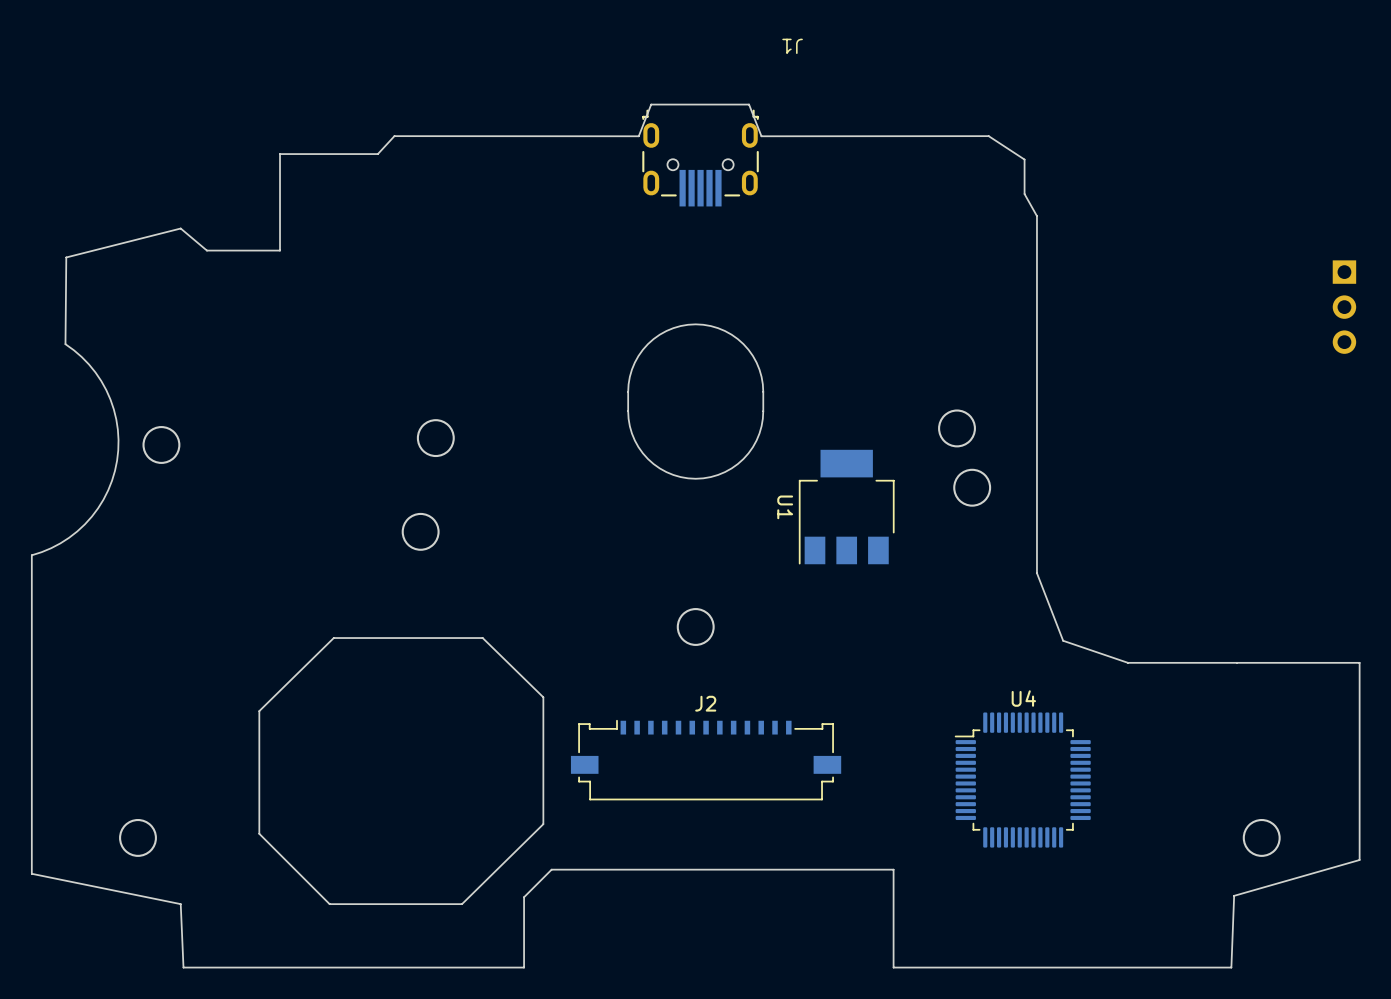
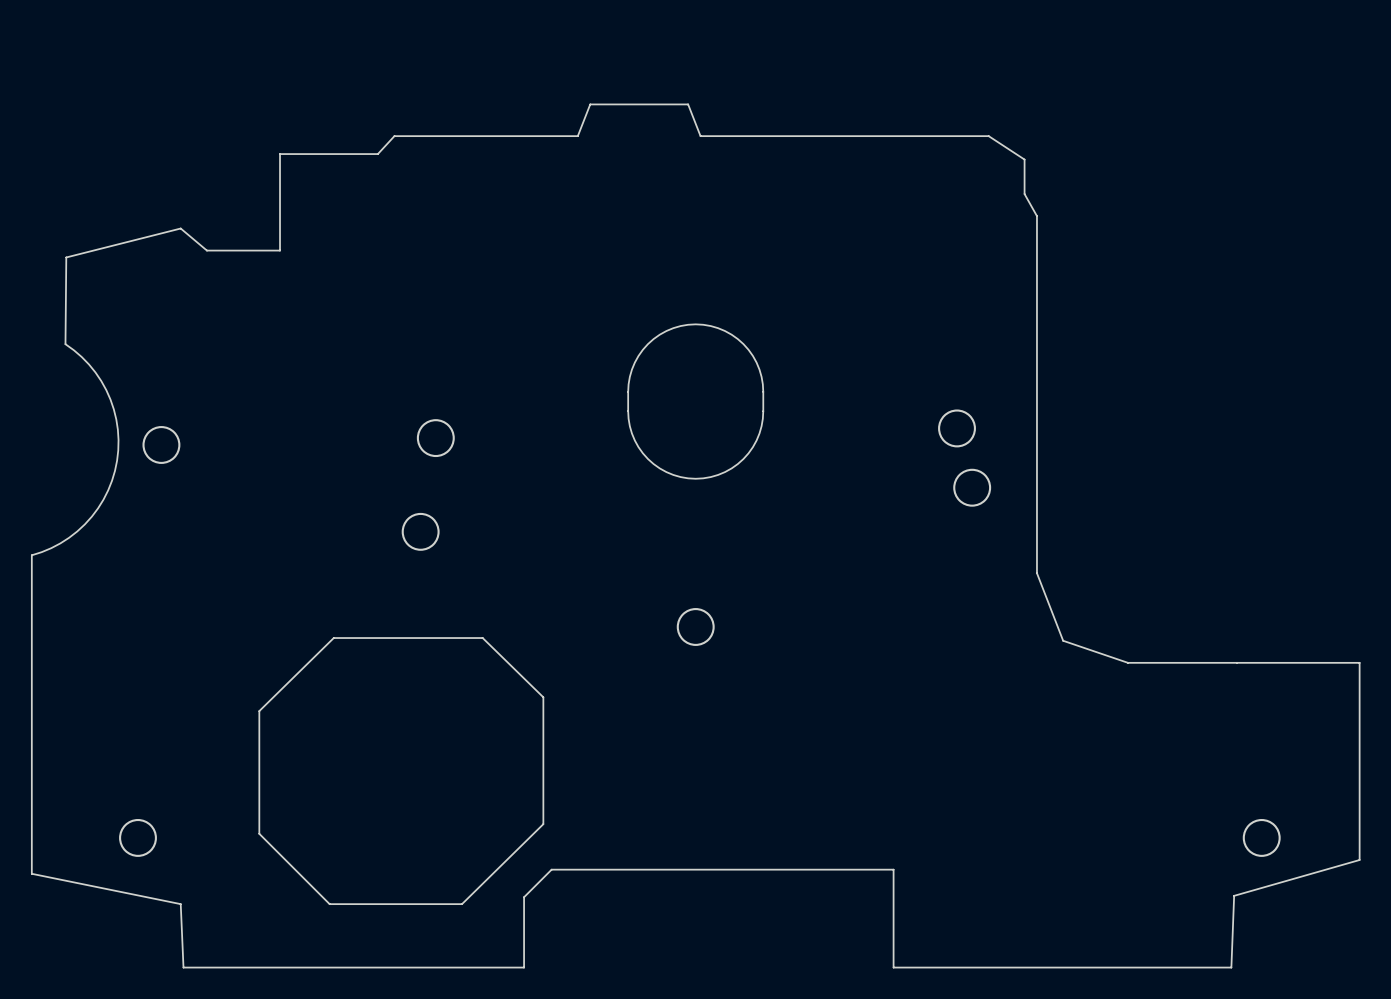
board edge: (988, 136) (761, 136) (749, 104) (651, 104) (638, 136) (394, 136) -> (988, 136) (700, 136) (688, 104) (590, 104) (577, 136) (394, 136)
J1: (700, 158) -> none
part: (1344, 307) -> none
U1: (846, 507) -> none
J2: (706, 760) -> none
U4: (1022, 780) -> none

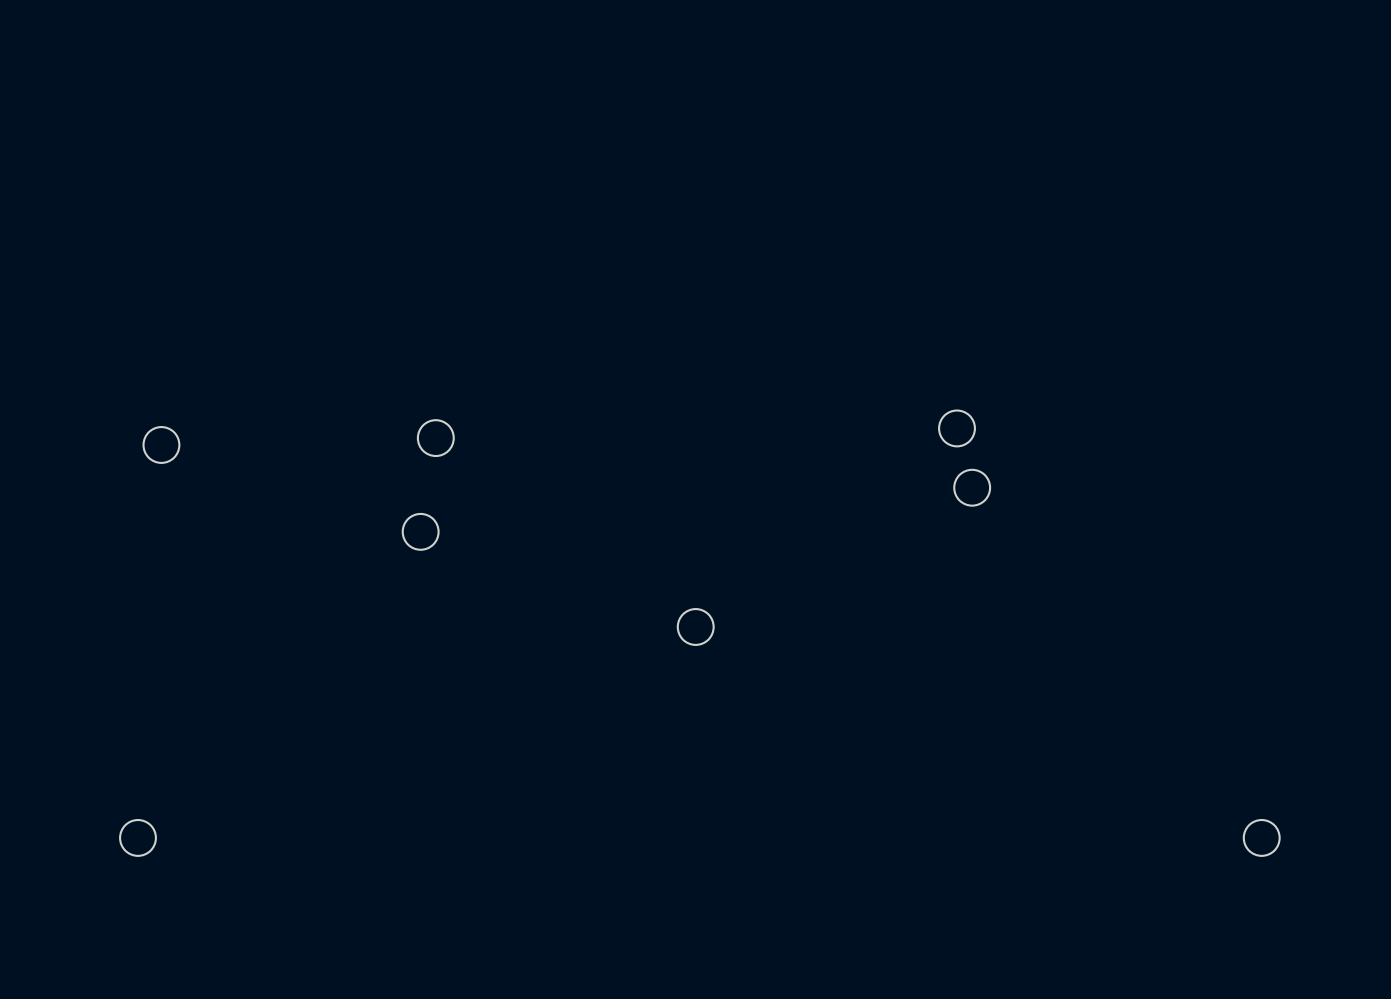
board edge: (688, 104) (700, 136) (988, 136) (1024, 159) (1024, 194) (1036, 216) (1036, 573) (1063, 640) (1127, 662) (1359, 662) (1359, 860) (1234, 895) (1231, 967) (893, 967) (893, 869) (551, 869) (524, 897) (524, 967) (183, 967) (180, 904) (31, 873) (31, 555) (51, 548) (69, 537) (91, 516) (108, 490) (115, 470) (118, 450) (116, 419) (106, 390) (88, 364) (65, 344) (66, 257) (180, 228) (206, 250) (280, 250) (280, 154) (377, 154) (394, 136) (577, 136) (590, 104) (688, 104) -> none
board edge: (763, 391) (761, 426) (752, 447) (737, 464) (725, 472) (710, 477) (695, 478) (680, 477) (659, 468) (642, 453) (634, 440) (629, 426) (628, 384) (634, 362) (642, 349) (653, 339) (666, 331) (680, 326) (695, 324) (710, 326) (725, 331) (737, 339) (748, 349) (756, 362) (761, 376) (763, 391) -> none
board edge: (482, 638) (333, 638) (259, 711) (259, 833) (329, 904) (462, 904) (543, 824) (543, 697) (482, 638) -> none

